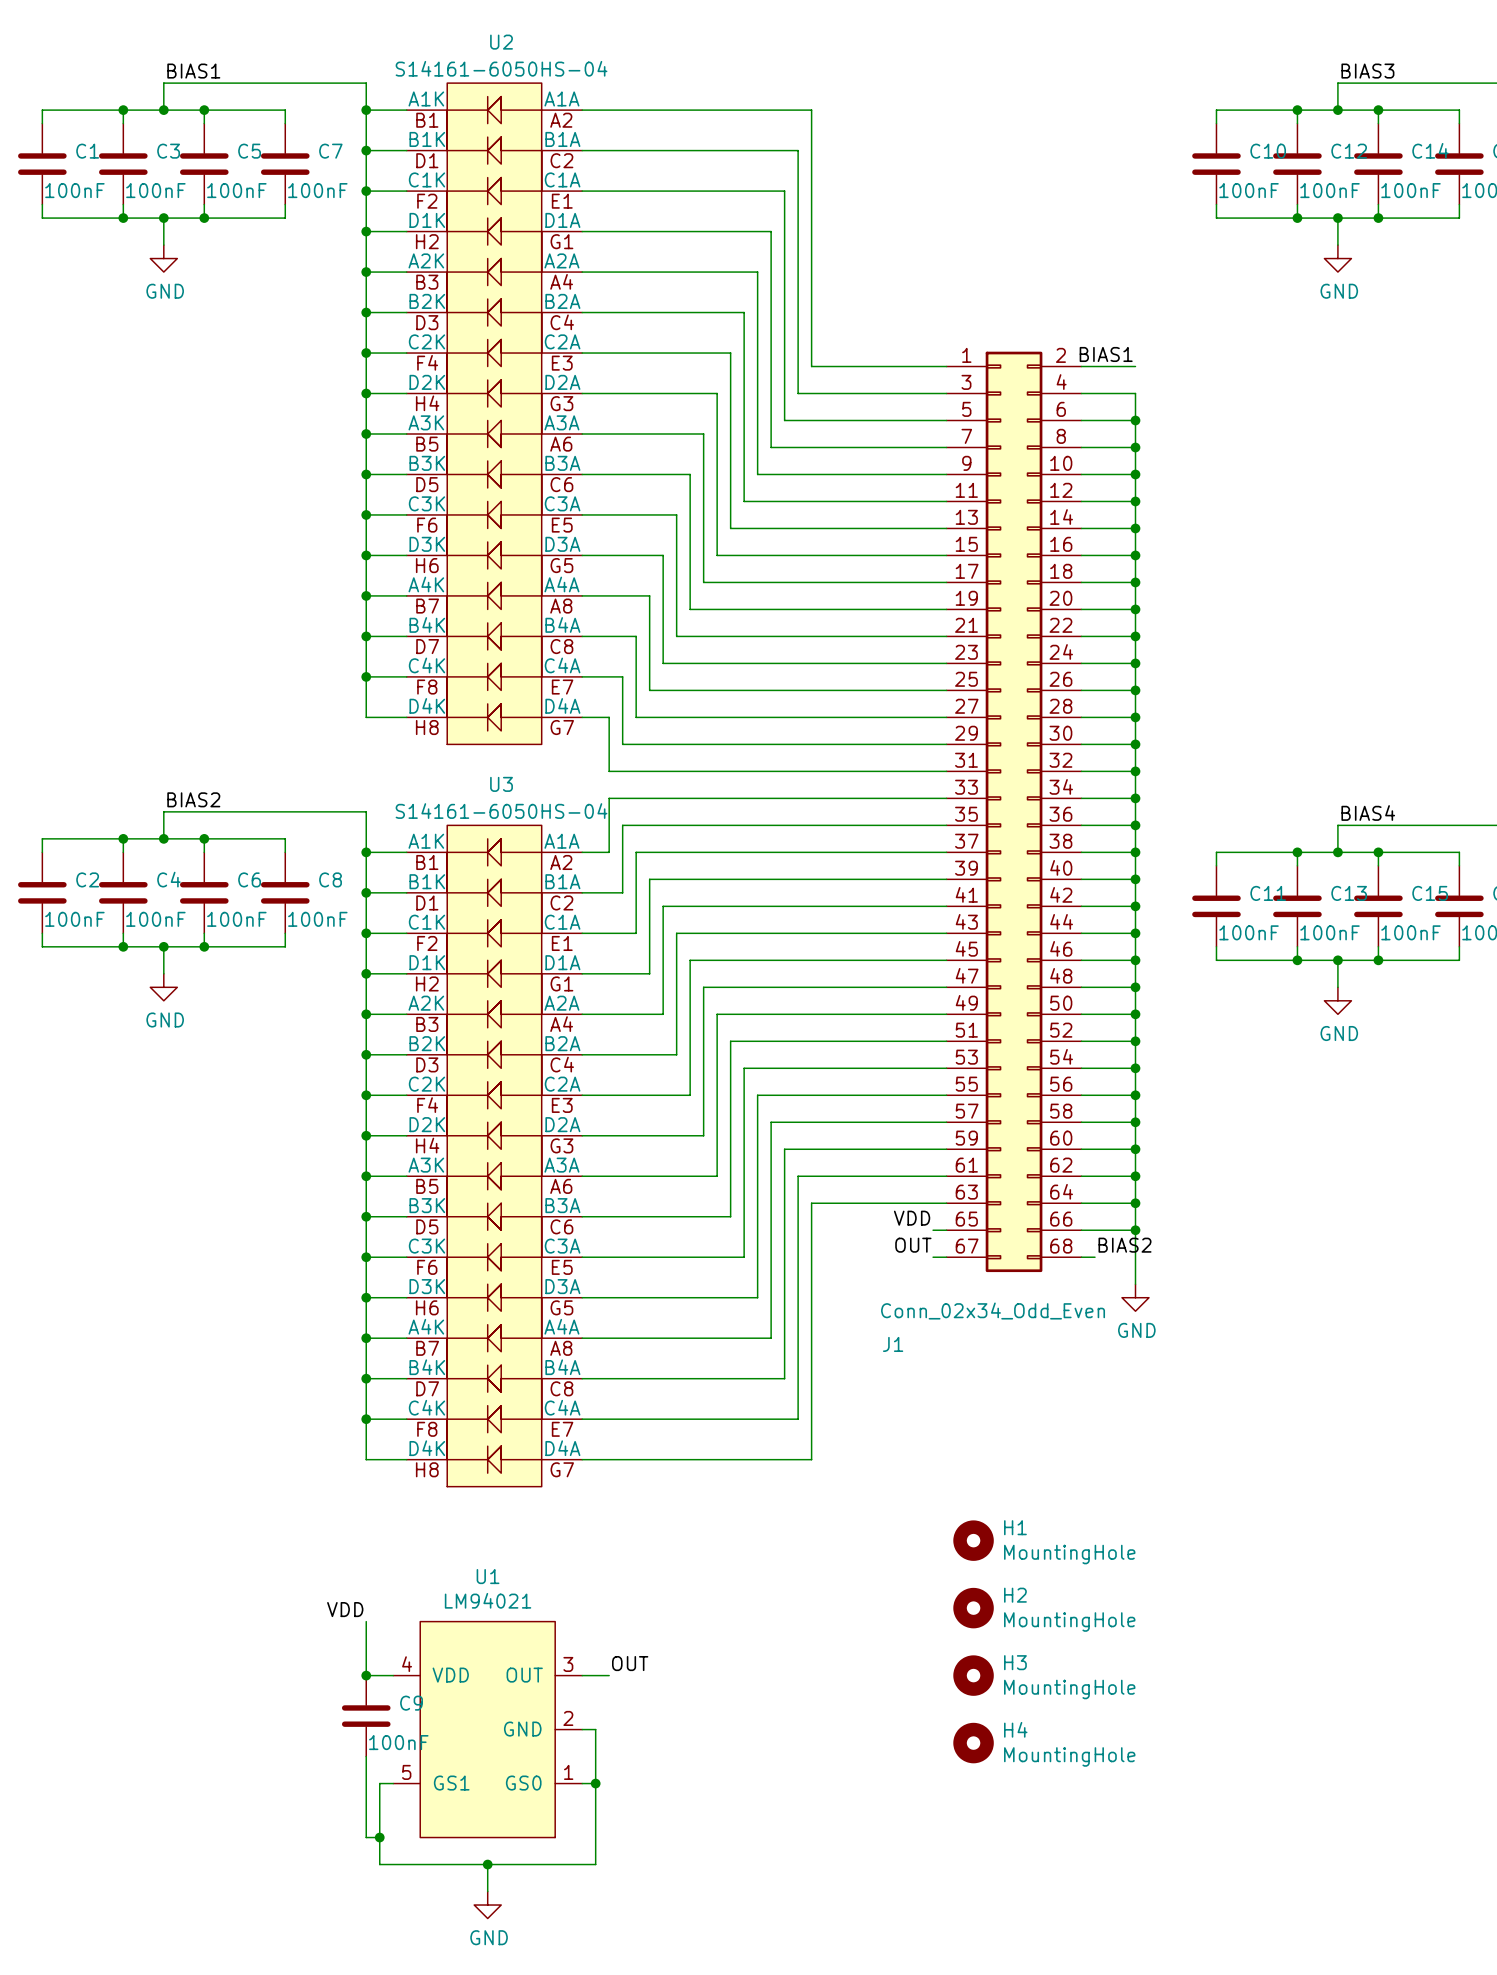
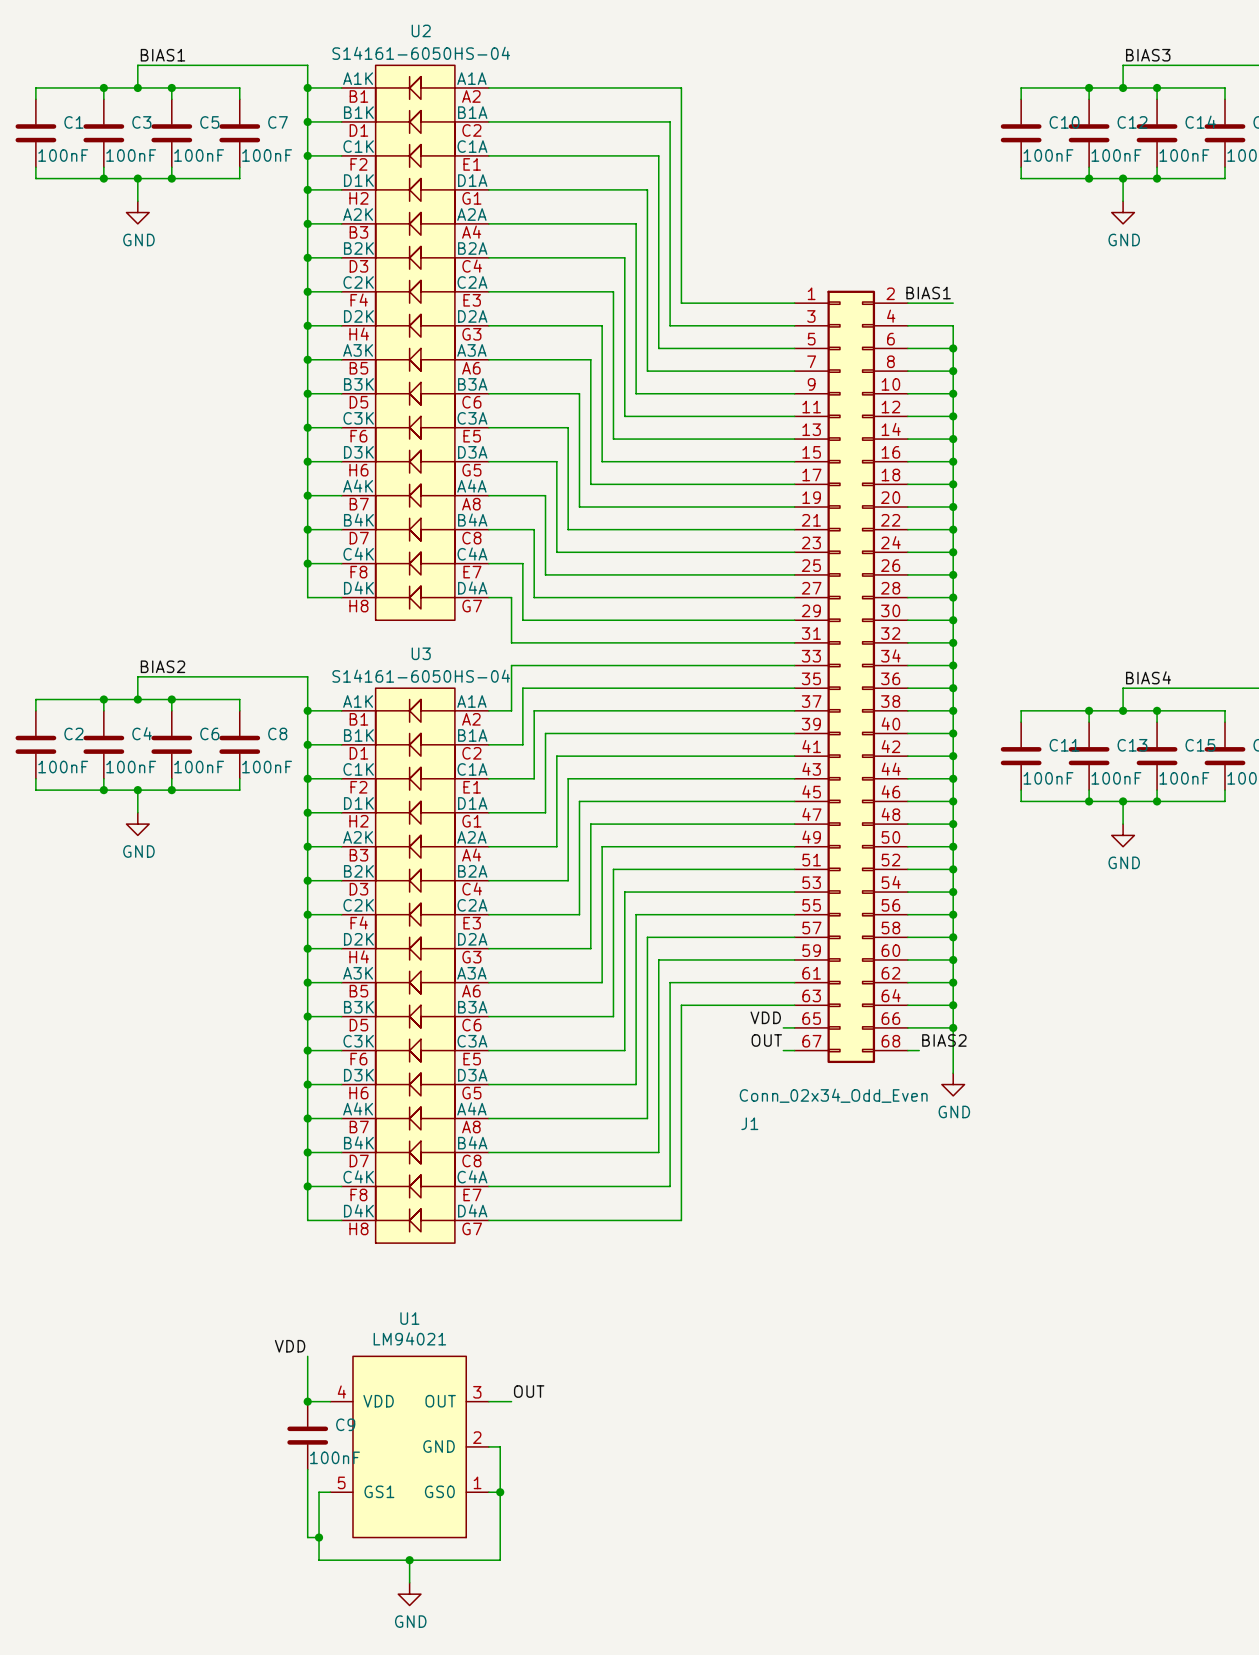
H1: MountingHole (973, 1540) -> none
H2: MountingHole (973, 1608) -> none
H3: MountingHole (973, 1675) -> none
H4: MountingHole (973, 1743) -> none

